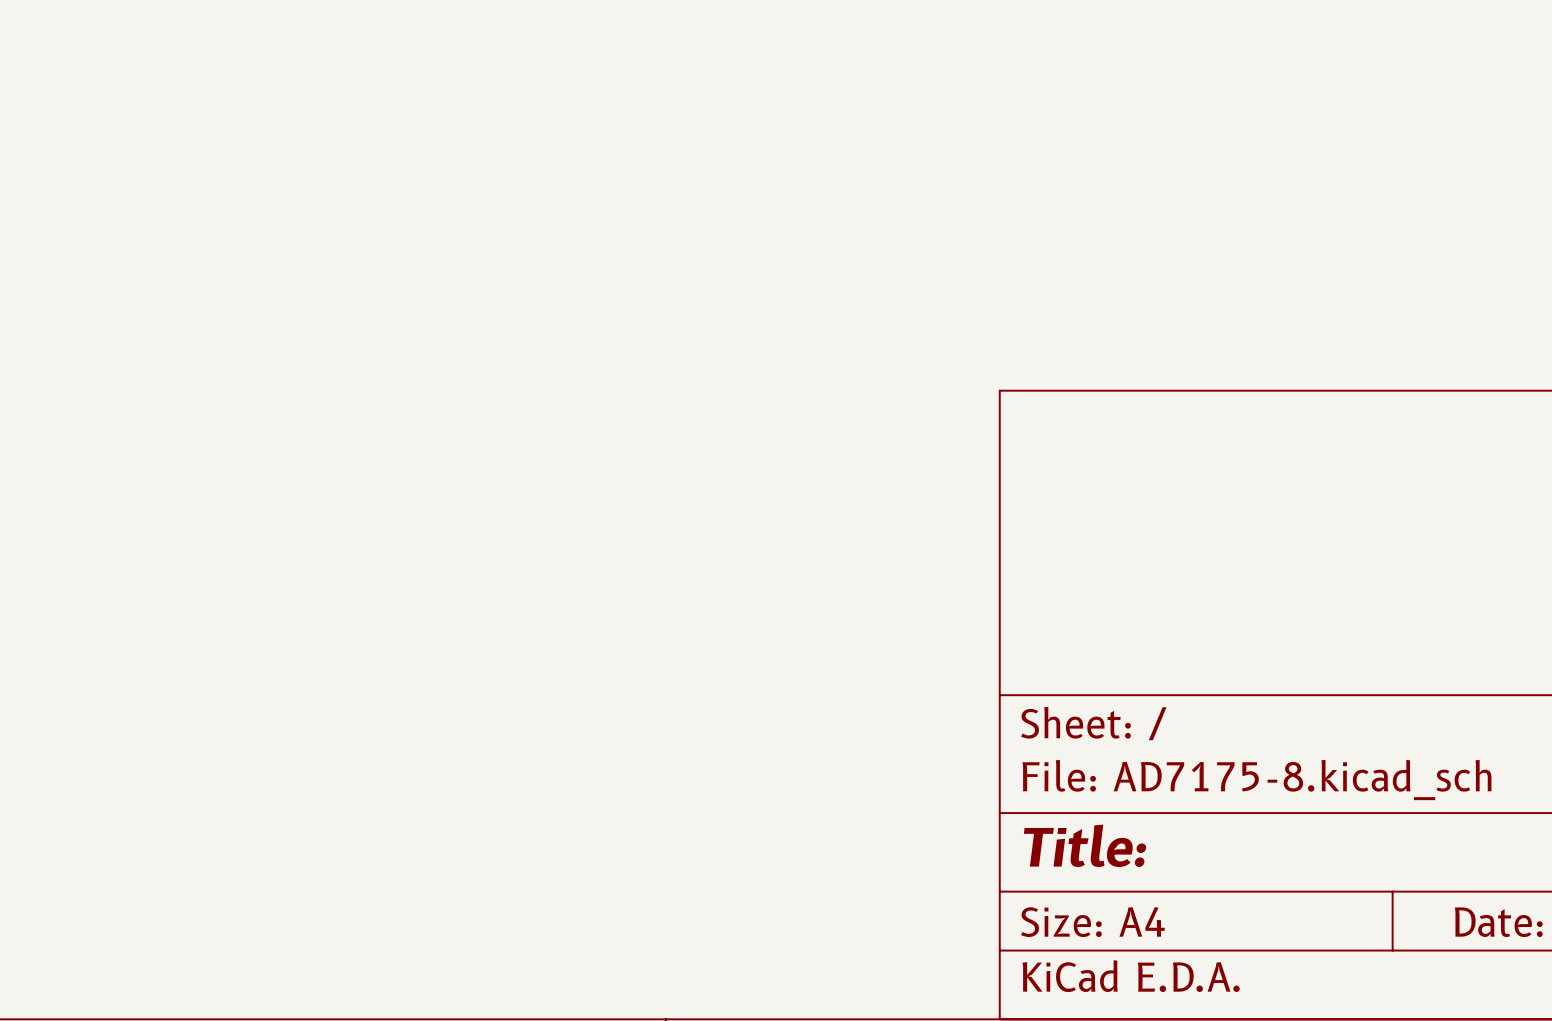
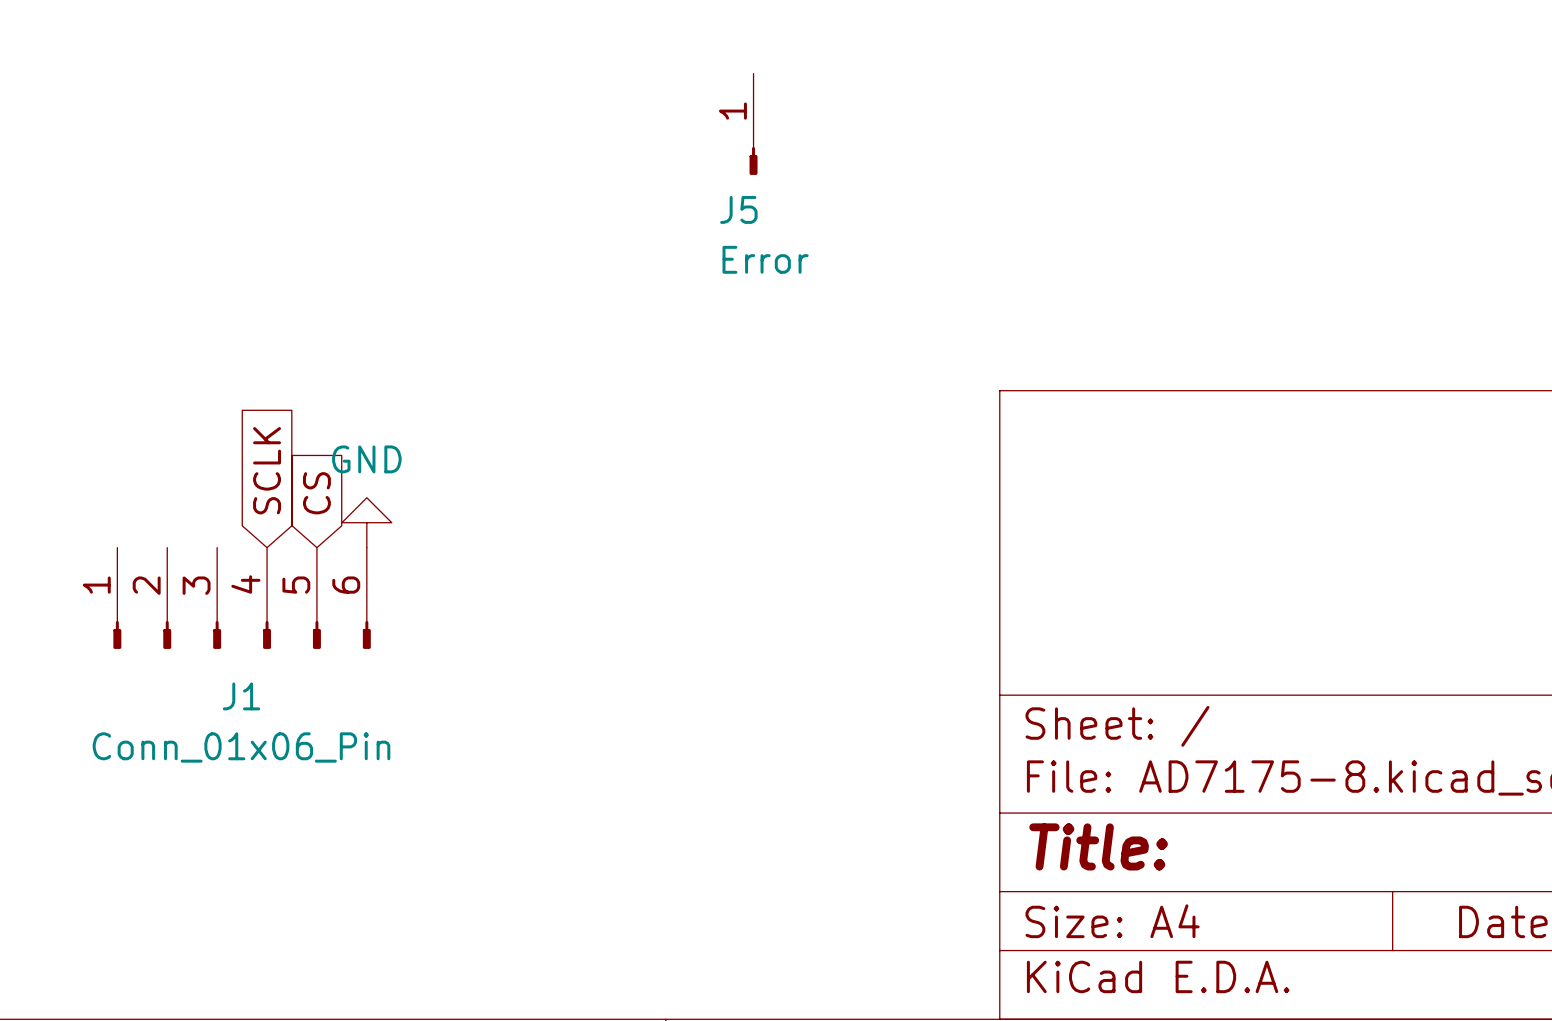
J5: none -> Error (753, 124)
global label: none -> SCLK (267, 470)
global label: none -> CS (316, 493)
power symbol: none -> GND (366, 522)
J1: none -> Conn_01x06_Pin (242, 598)

